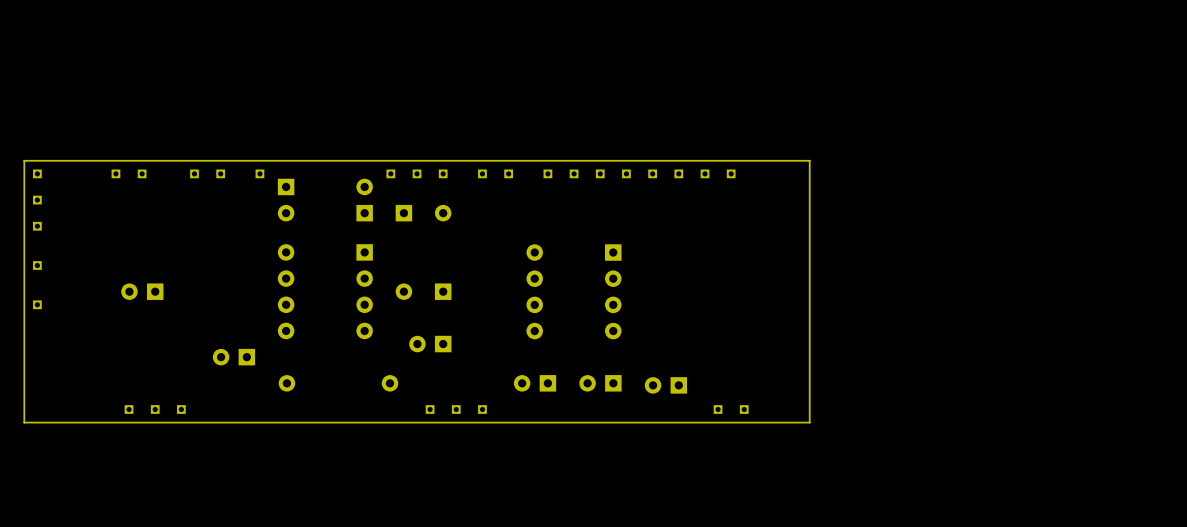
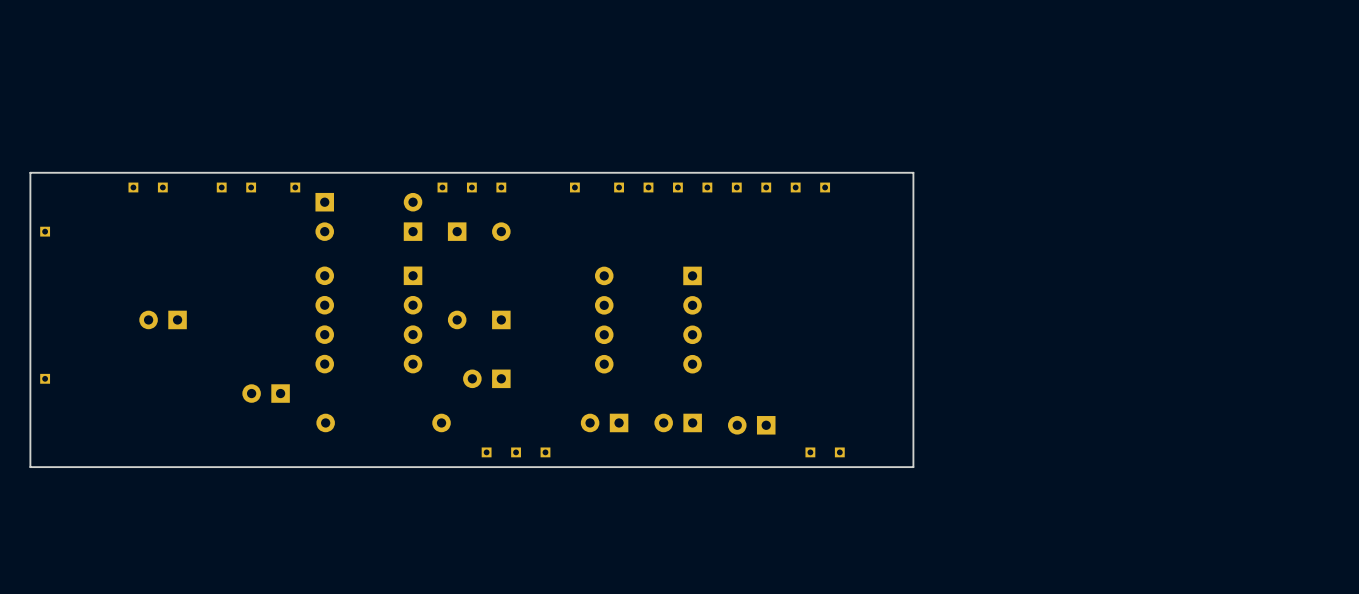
part: (37, 173) -> none
part: (482, 173) -> none
part: (37, 200) -> none
part: none -> (45, 231)
part: (37, 226) -> none
part: (37, 265) -> none
part: (37, 304) -> none
part: none -> (45, 378)
part: (129, 409) -> none
part: (155, 409) -> none
part: (181, 409) -> none

